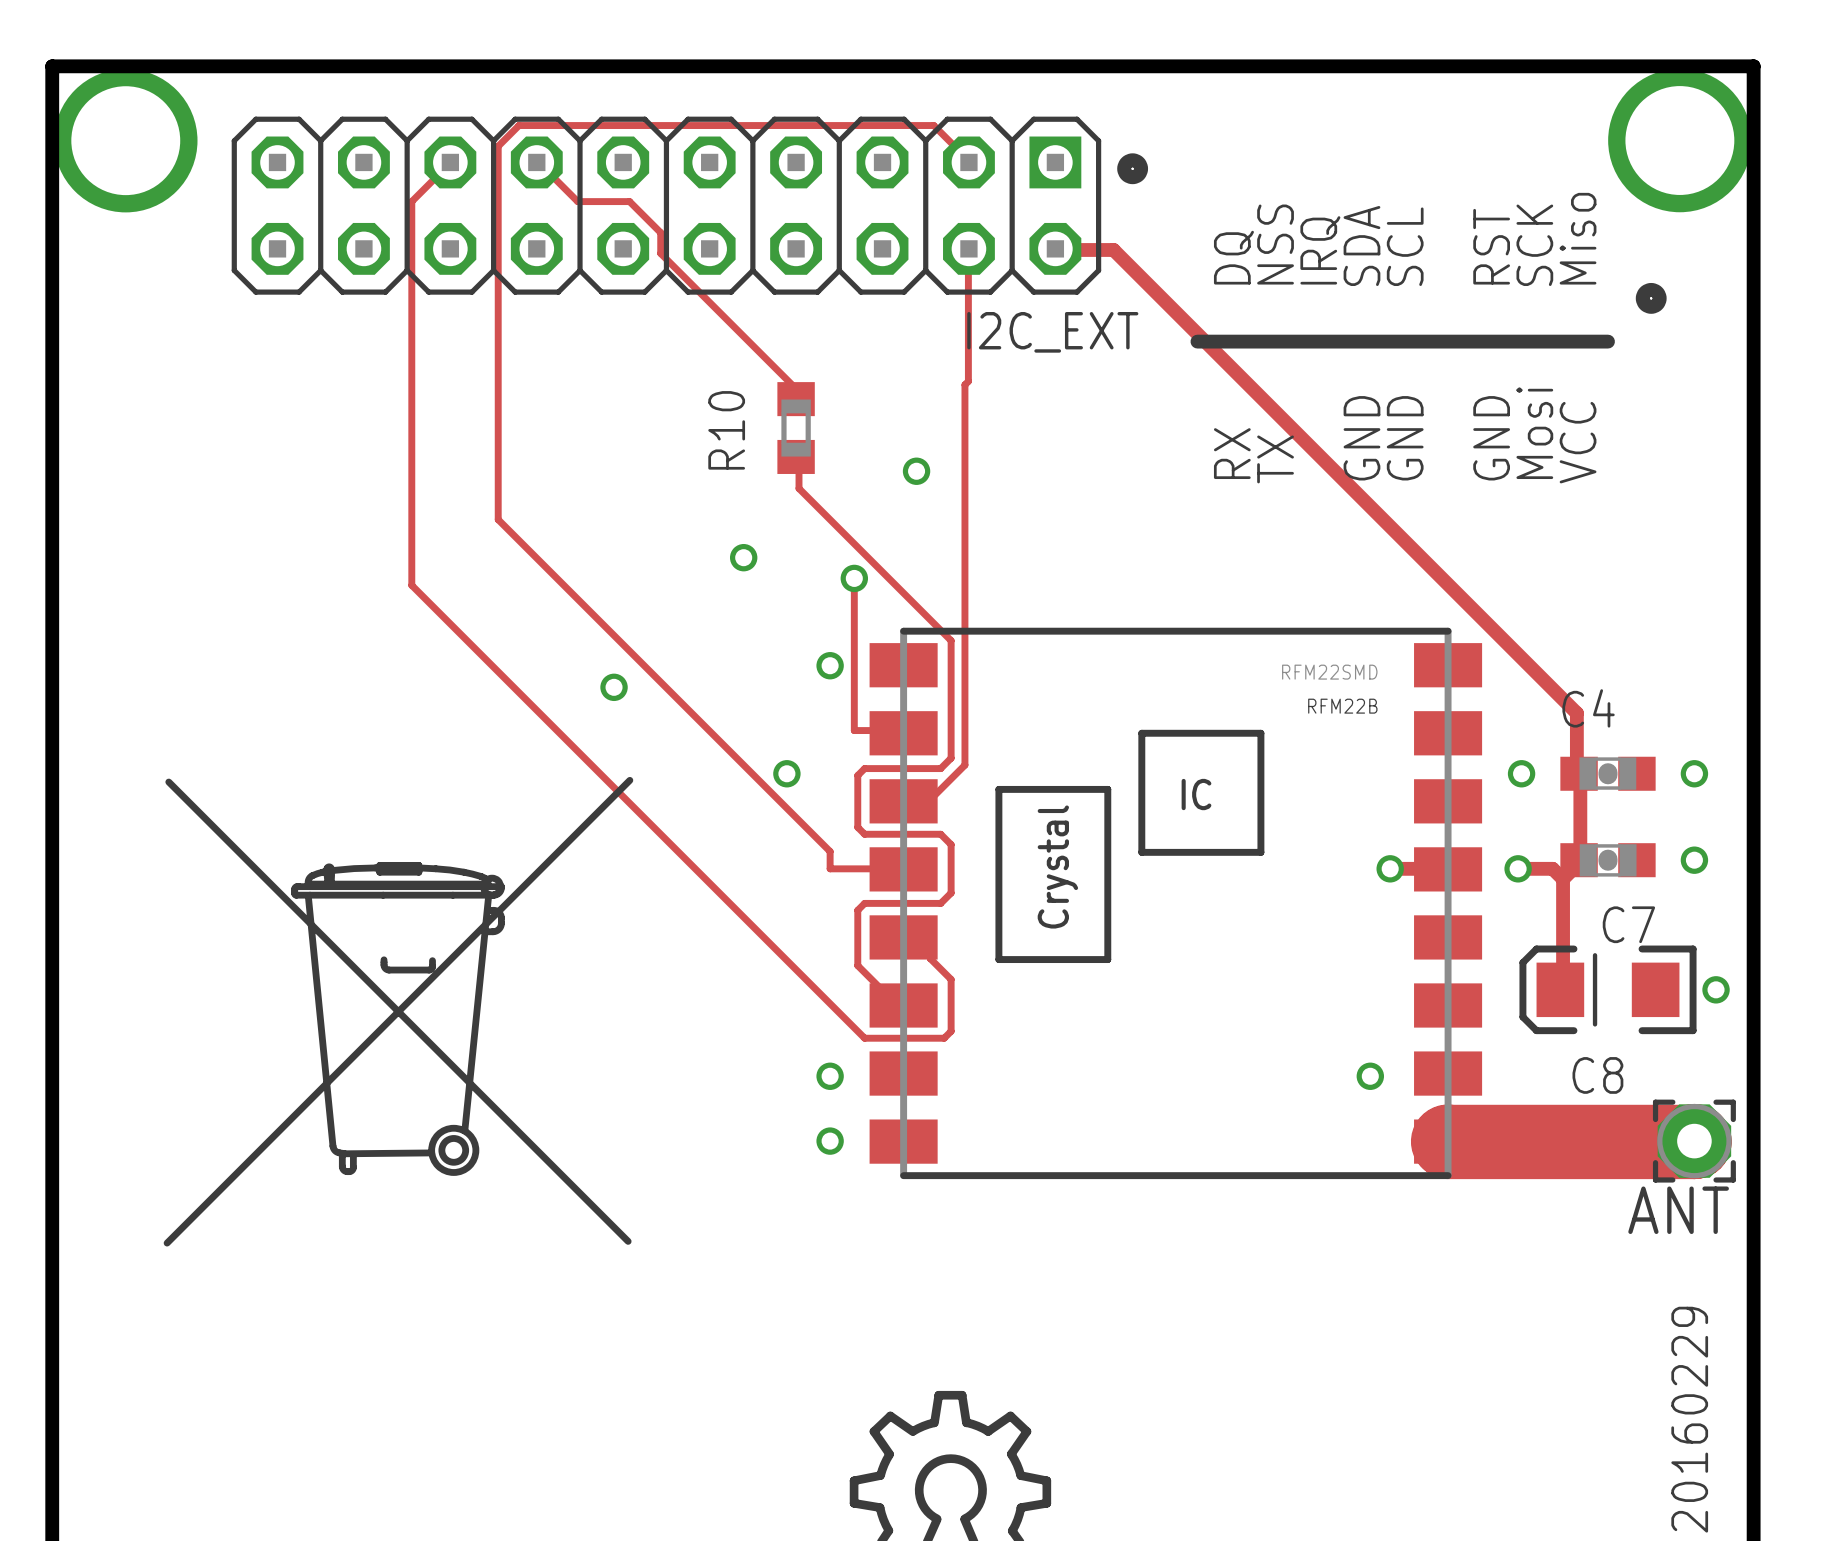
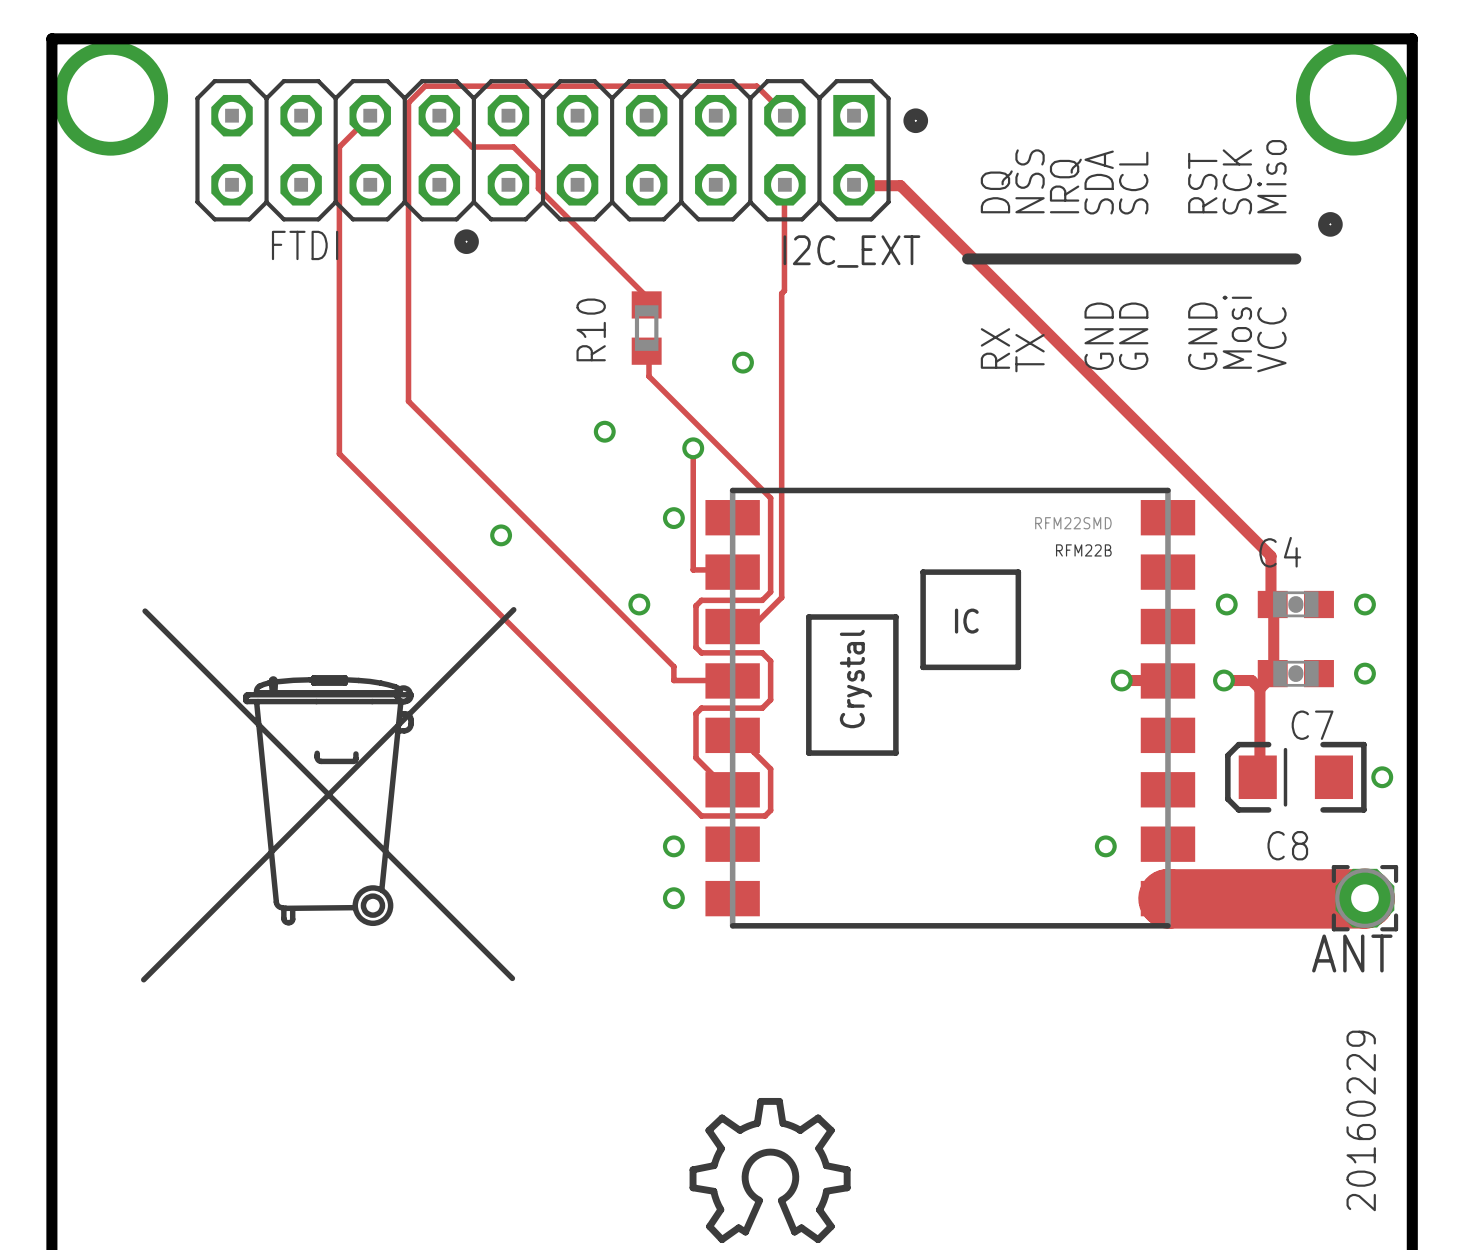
drawing: none -> [454, 229, 479, 255]
text: none -> FTDI (305, 245)

